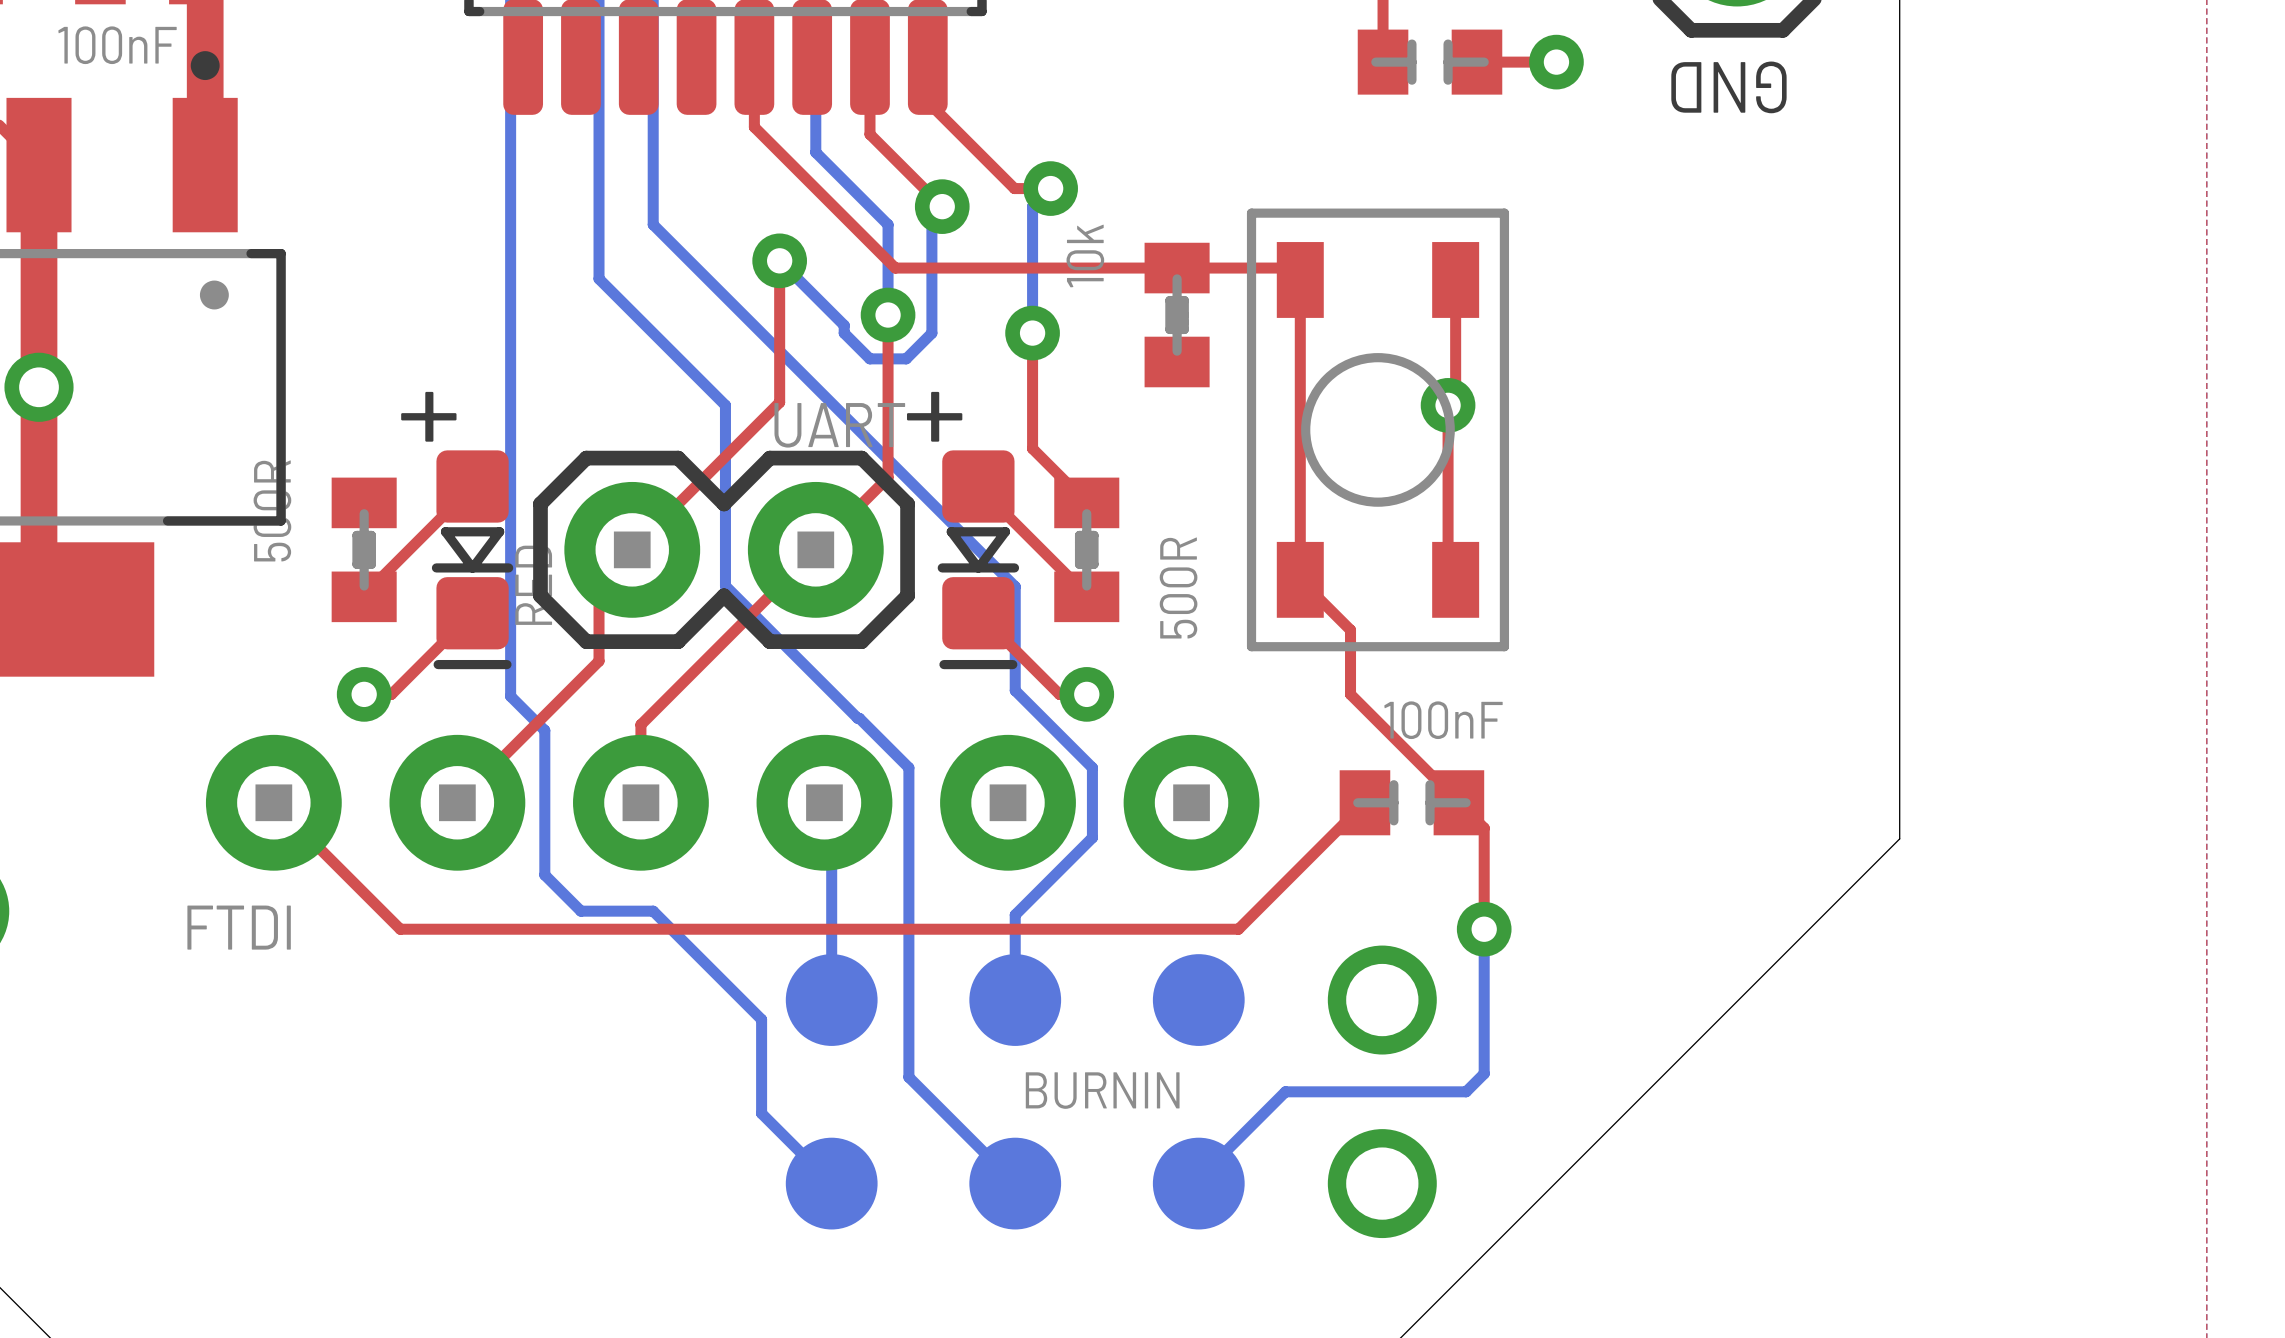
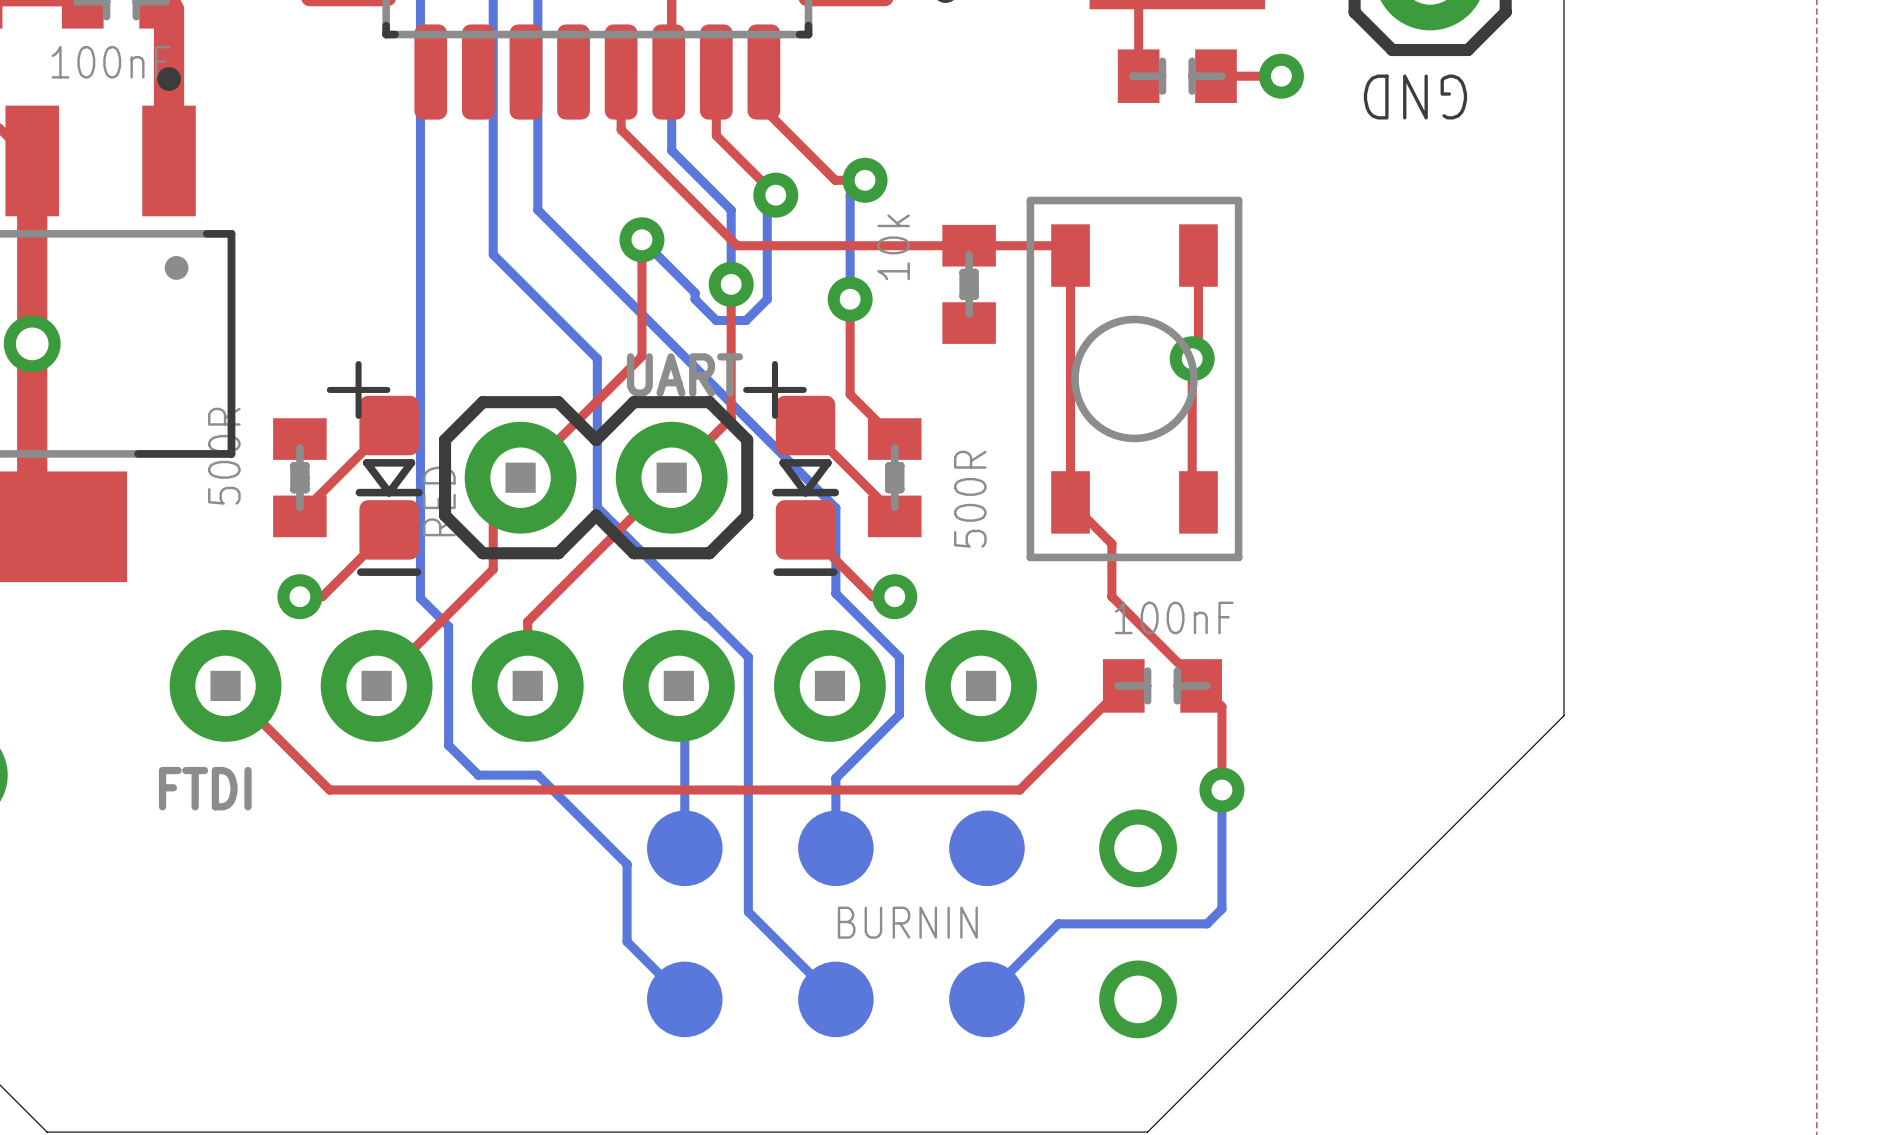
part footprint: [785, 945, 1437, 1239] -> [647, 809, 1177, 1039]

